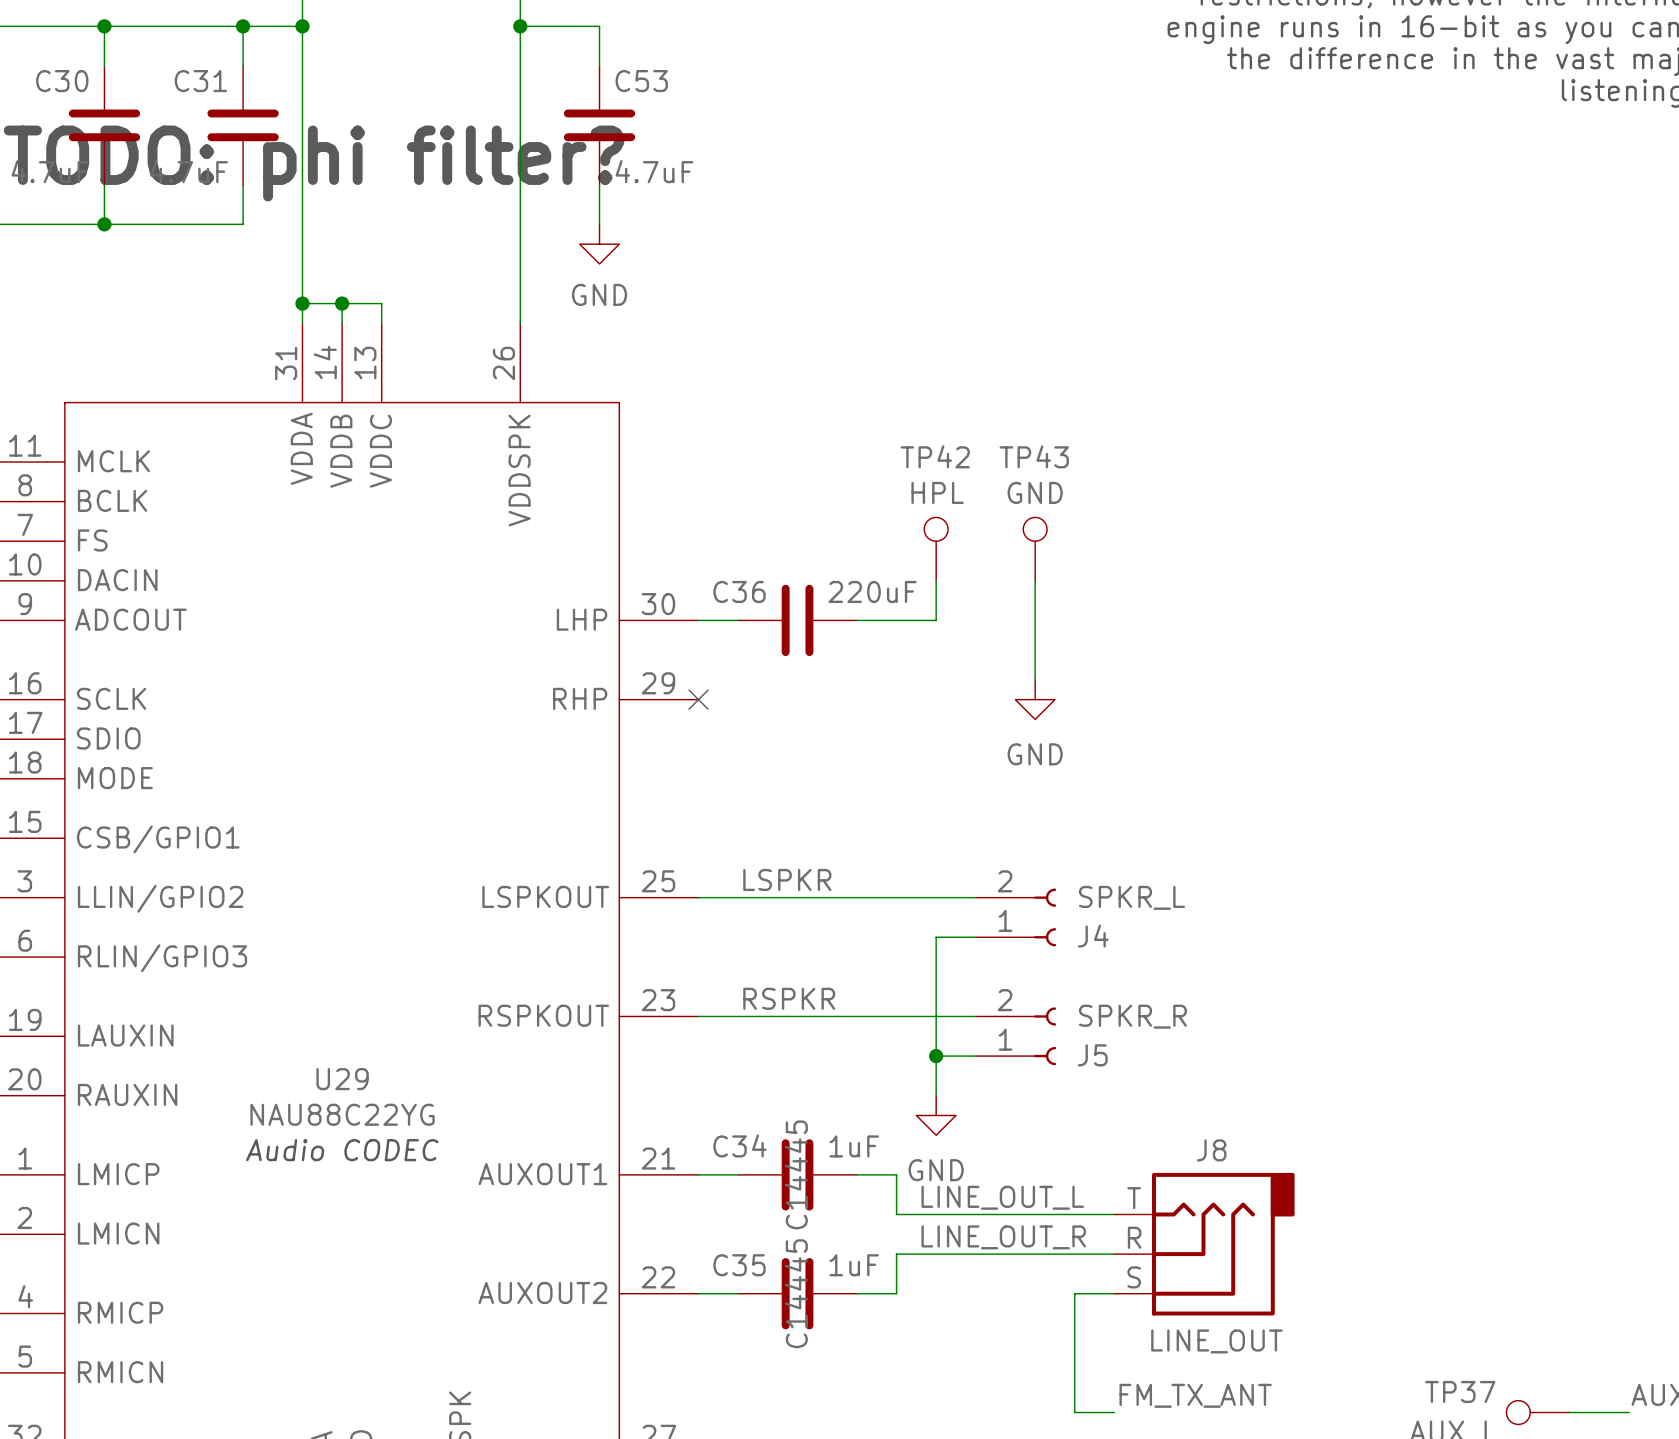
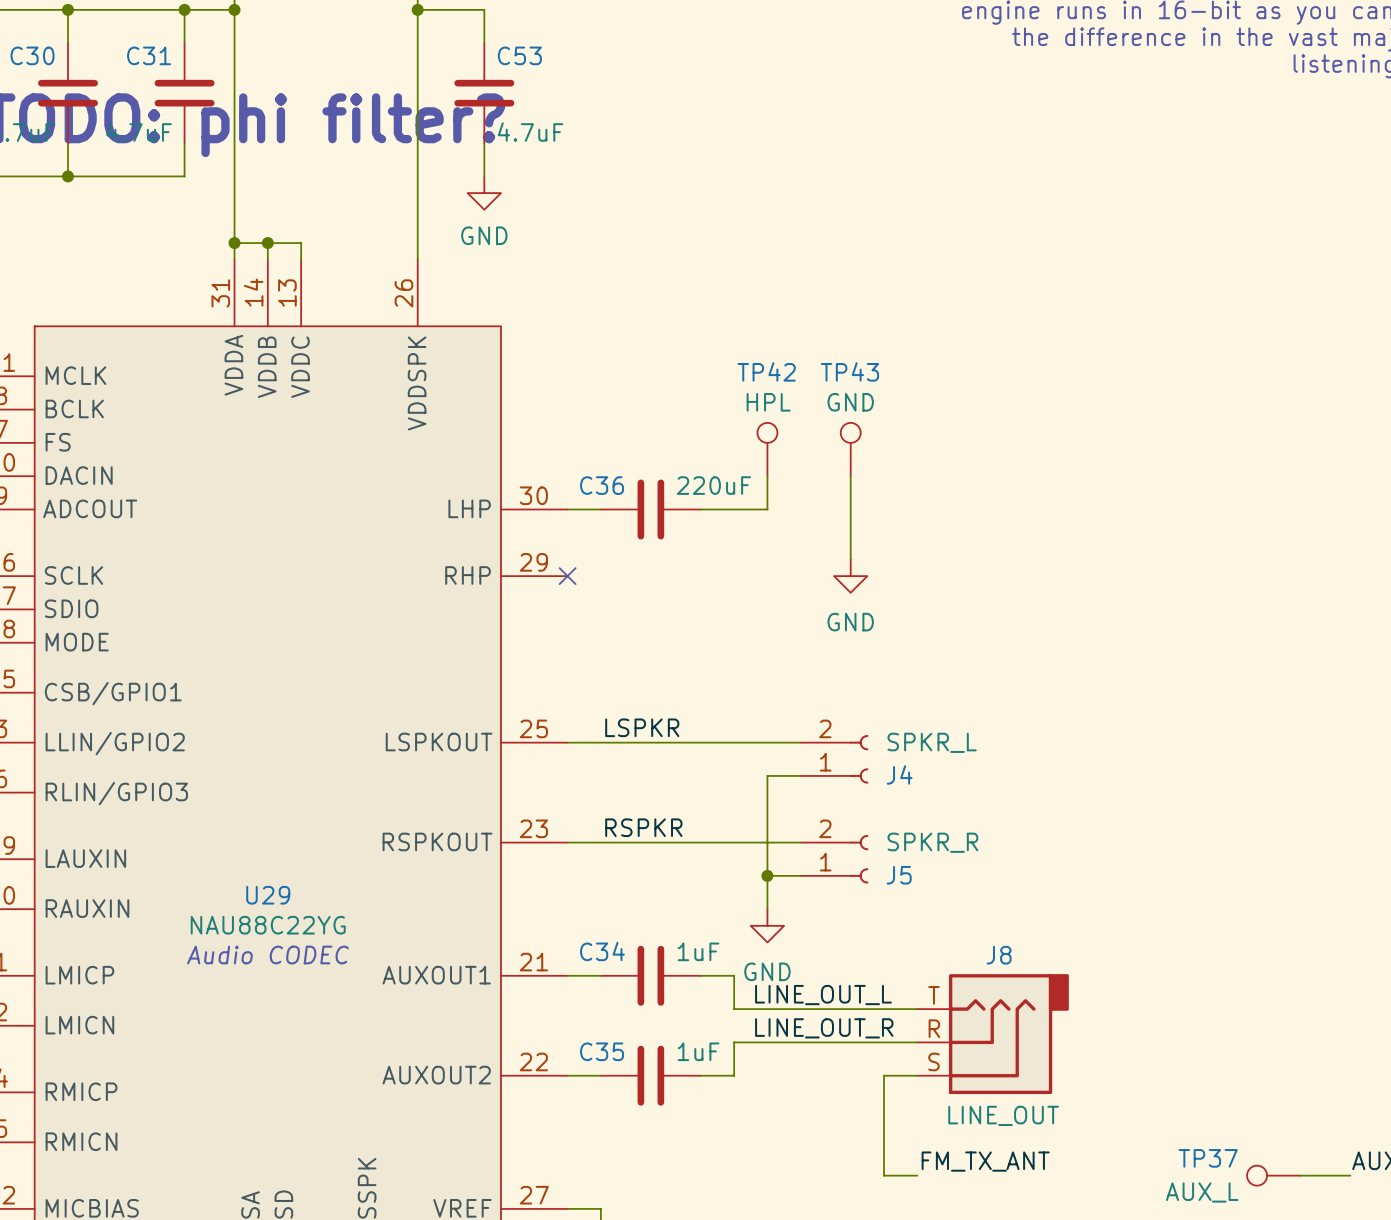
C34 text: C14445 (796, 1174) -> none
C35 text: C14445 (796, 1293) -> none

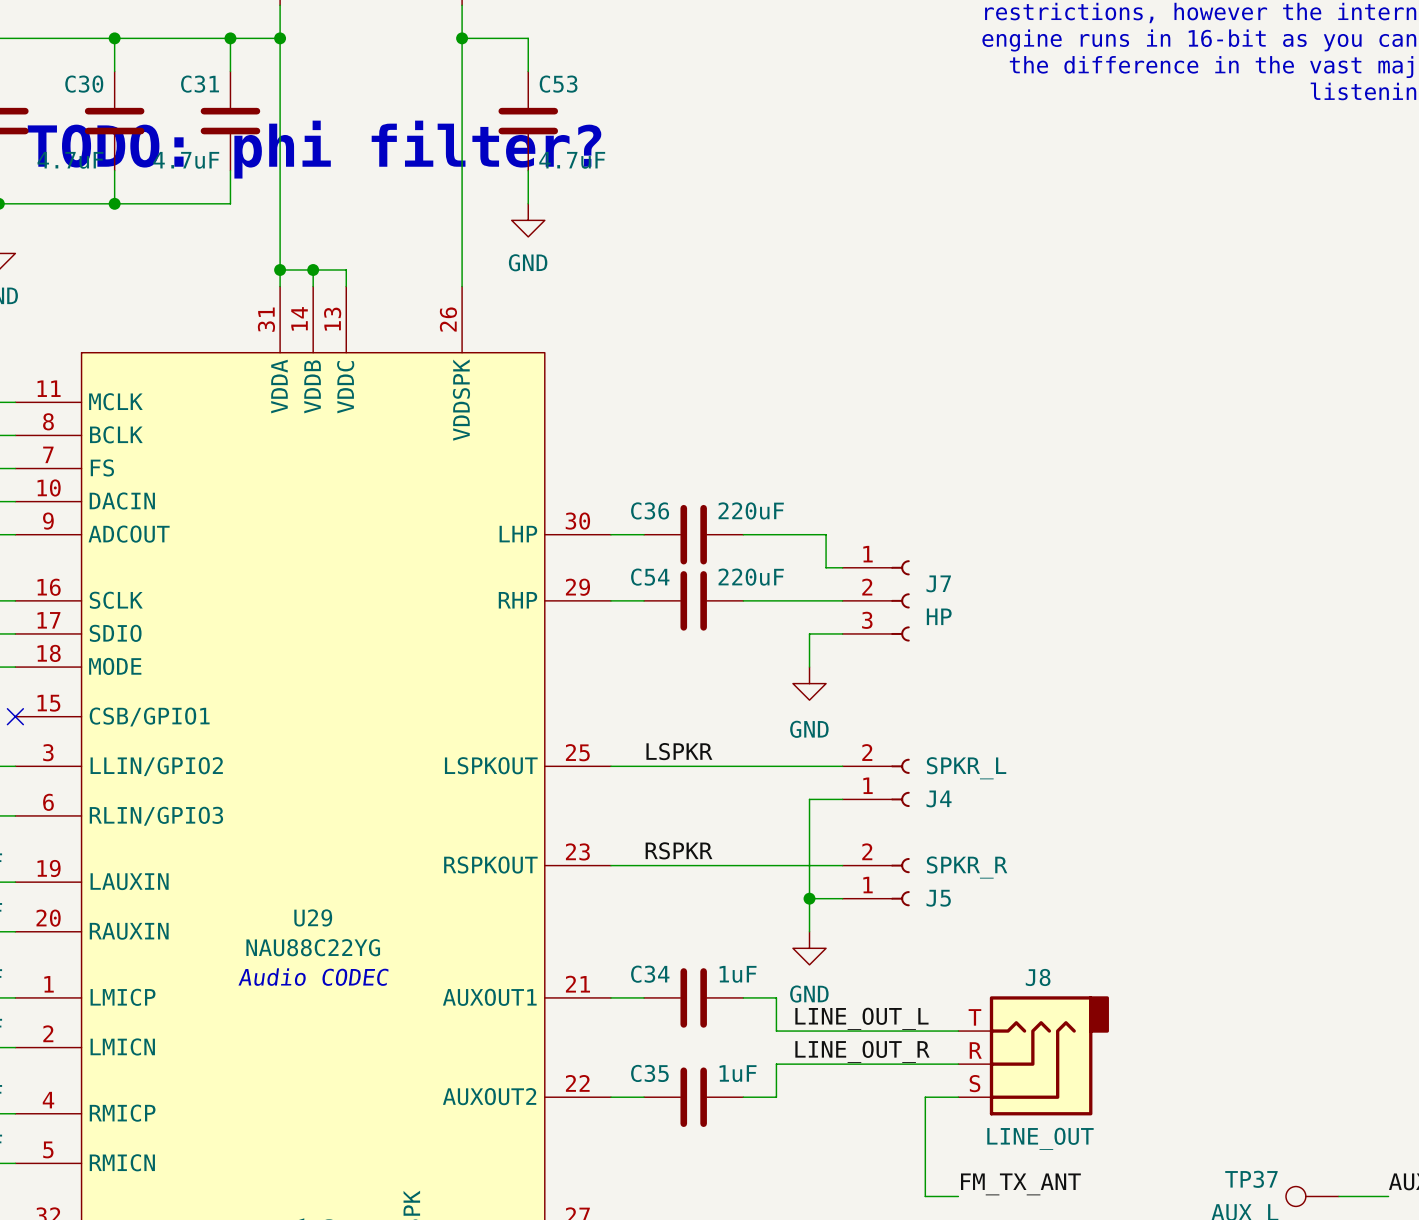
TP42: HPL (767, 449) -> none
TP43: GND (850, 449) -> none
wire: (767, 476) (767, 509) -> (842, 567) (826, 567) (826, 534) (809, 534)
wire: (850, 476) (850, 559) -> none
wire: none -> (610, 600) (644, 600)
no-connect mark: (567, 576) -> none
C54: none -> 220uF (693, 600)
wire: none -> (743, 600) (842, 600)
J7: none -> HP (876, 600)
power symbol position: GND (850, 576) -> GND (809, 683)
wire: none -> (842, 633) (809, 633) (809, 667)

